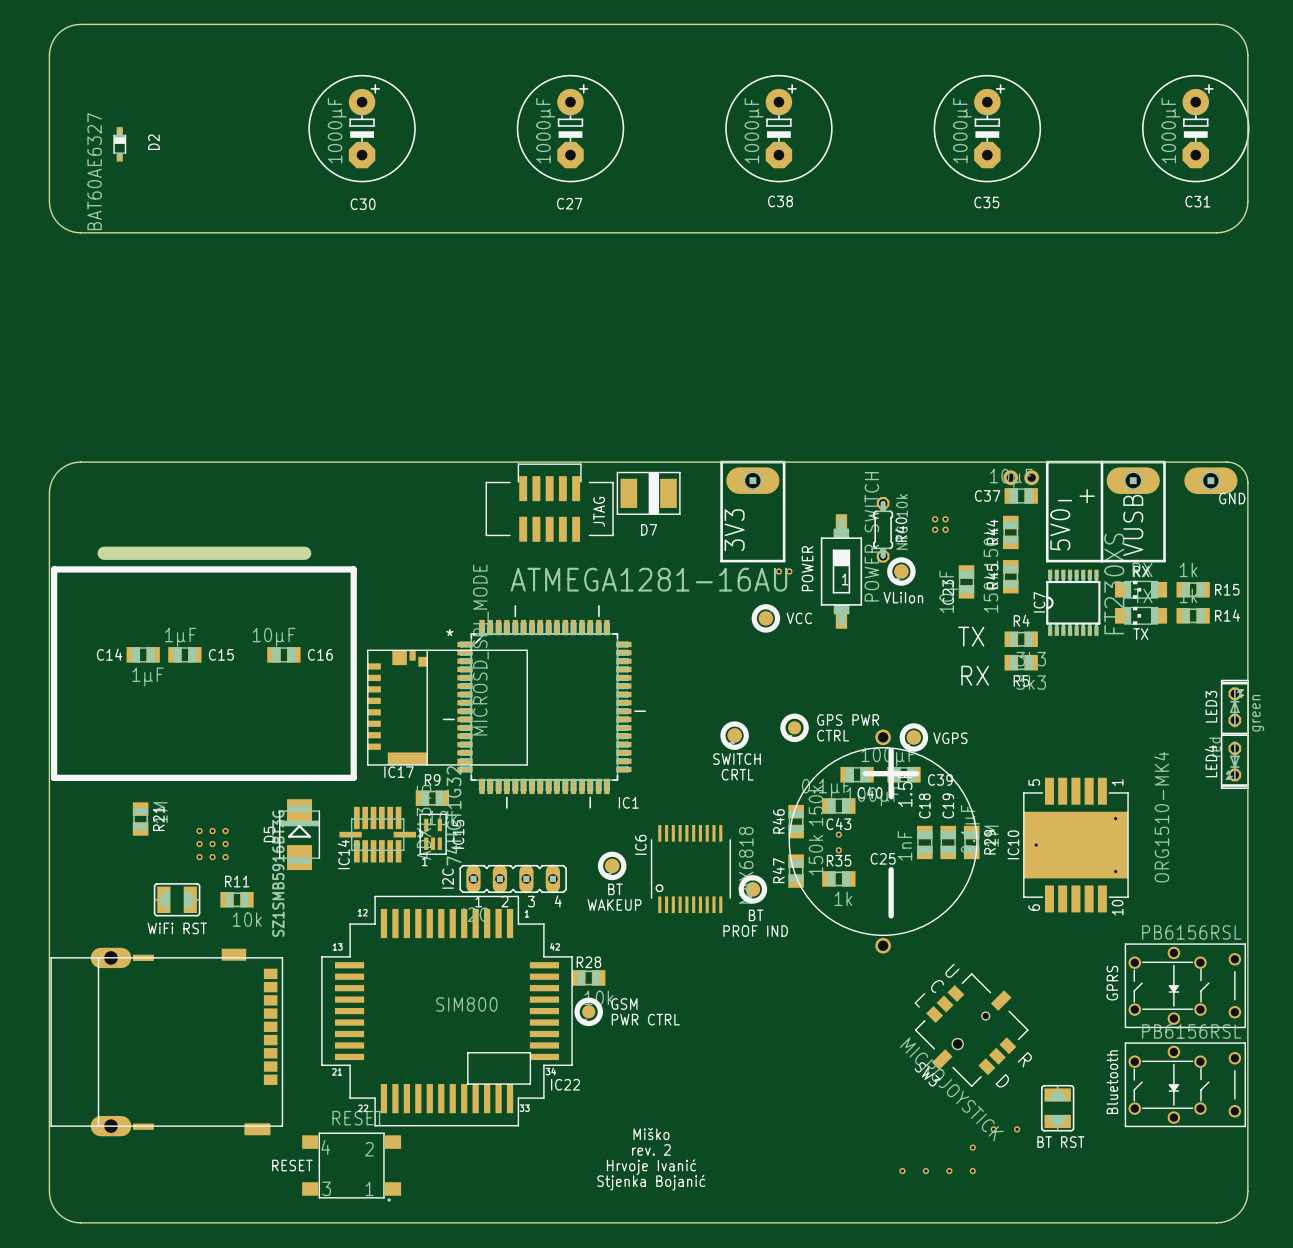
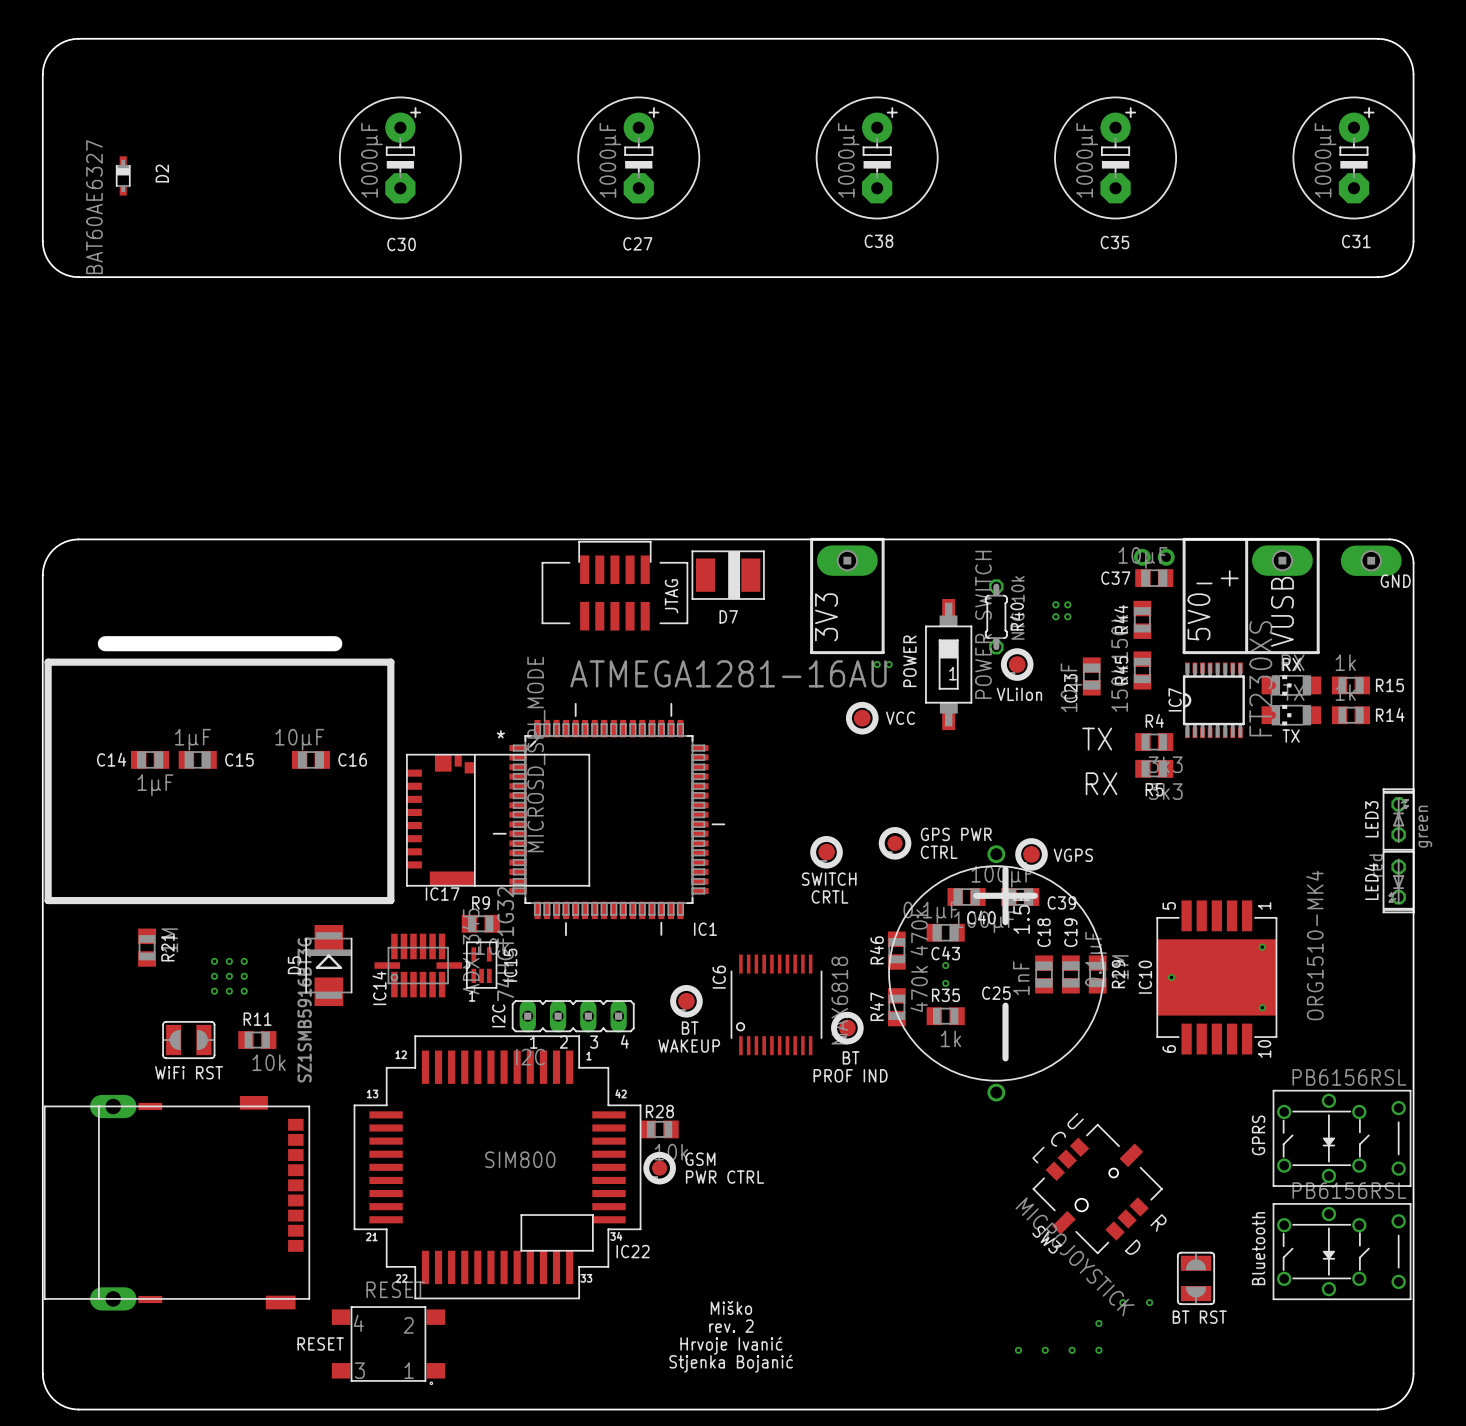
R46 value: 150k (815, 805) -> 470k (919, 932)
R47 value: 150k (815, 855) -> 470k (919, 989)

